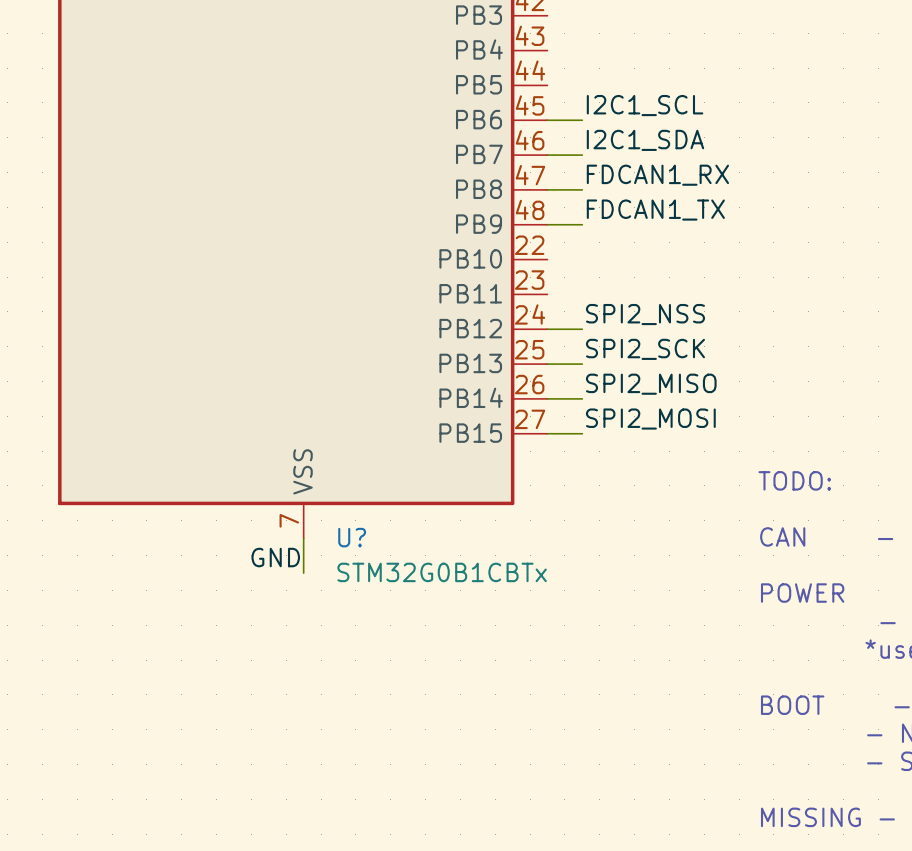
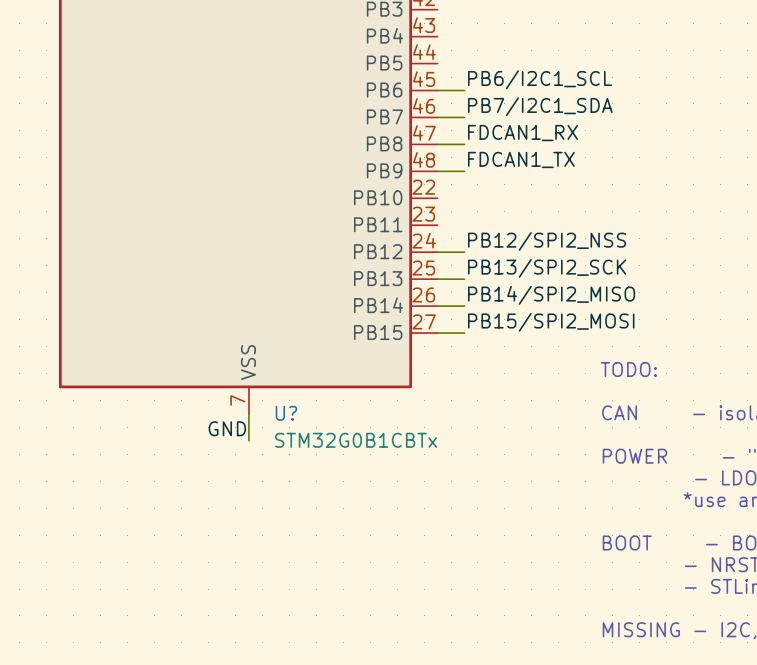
label: I2C1_SCL (645, 105) -> PB6/I2C1_SCL (540, 79)
label: I2C1_SDA (645, 140) -> PB7/I2C1_SDA (540, 106)
label: SPI2_NSS (645, 314) -> PB12/SPI2_NSS (547, 241)
label: SPI2_SCK (645, 349) -> PB13/SPI2_SCK (547, 268)
label: SPI2_MISO (651, 384) -> PB14/SPI2_MISO (551, 295)
label: SPI2_MOSI (650, 419) -> PB15/SPI2_MOSI (551, 322)

